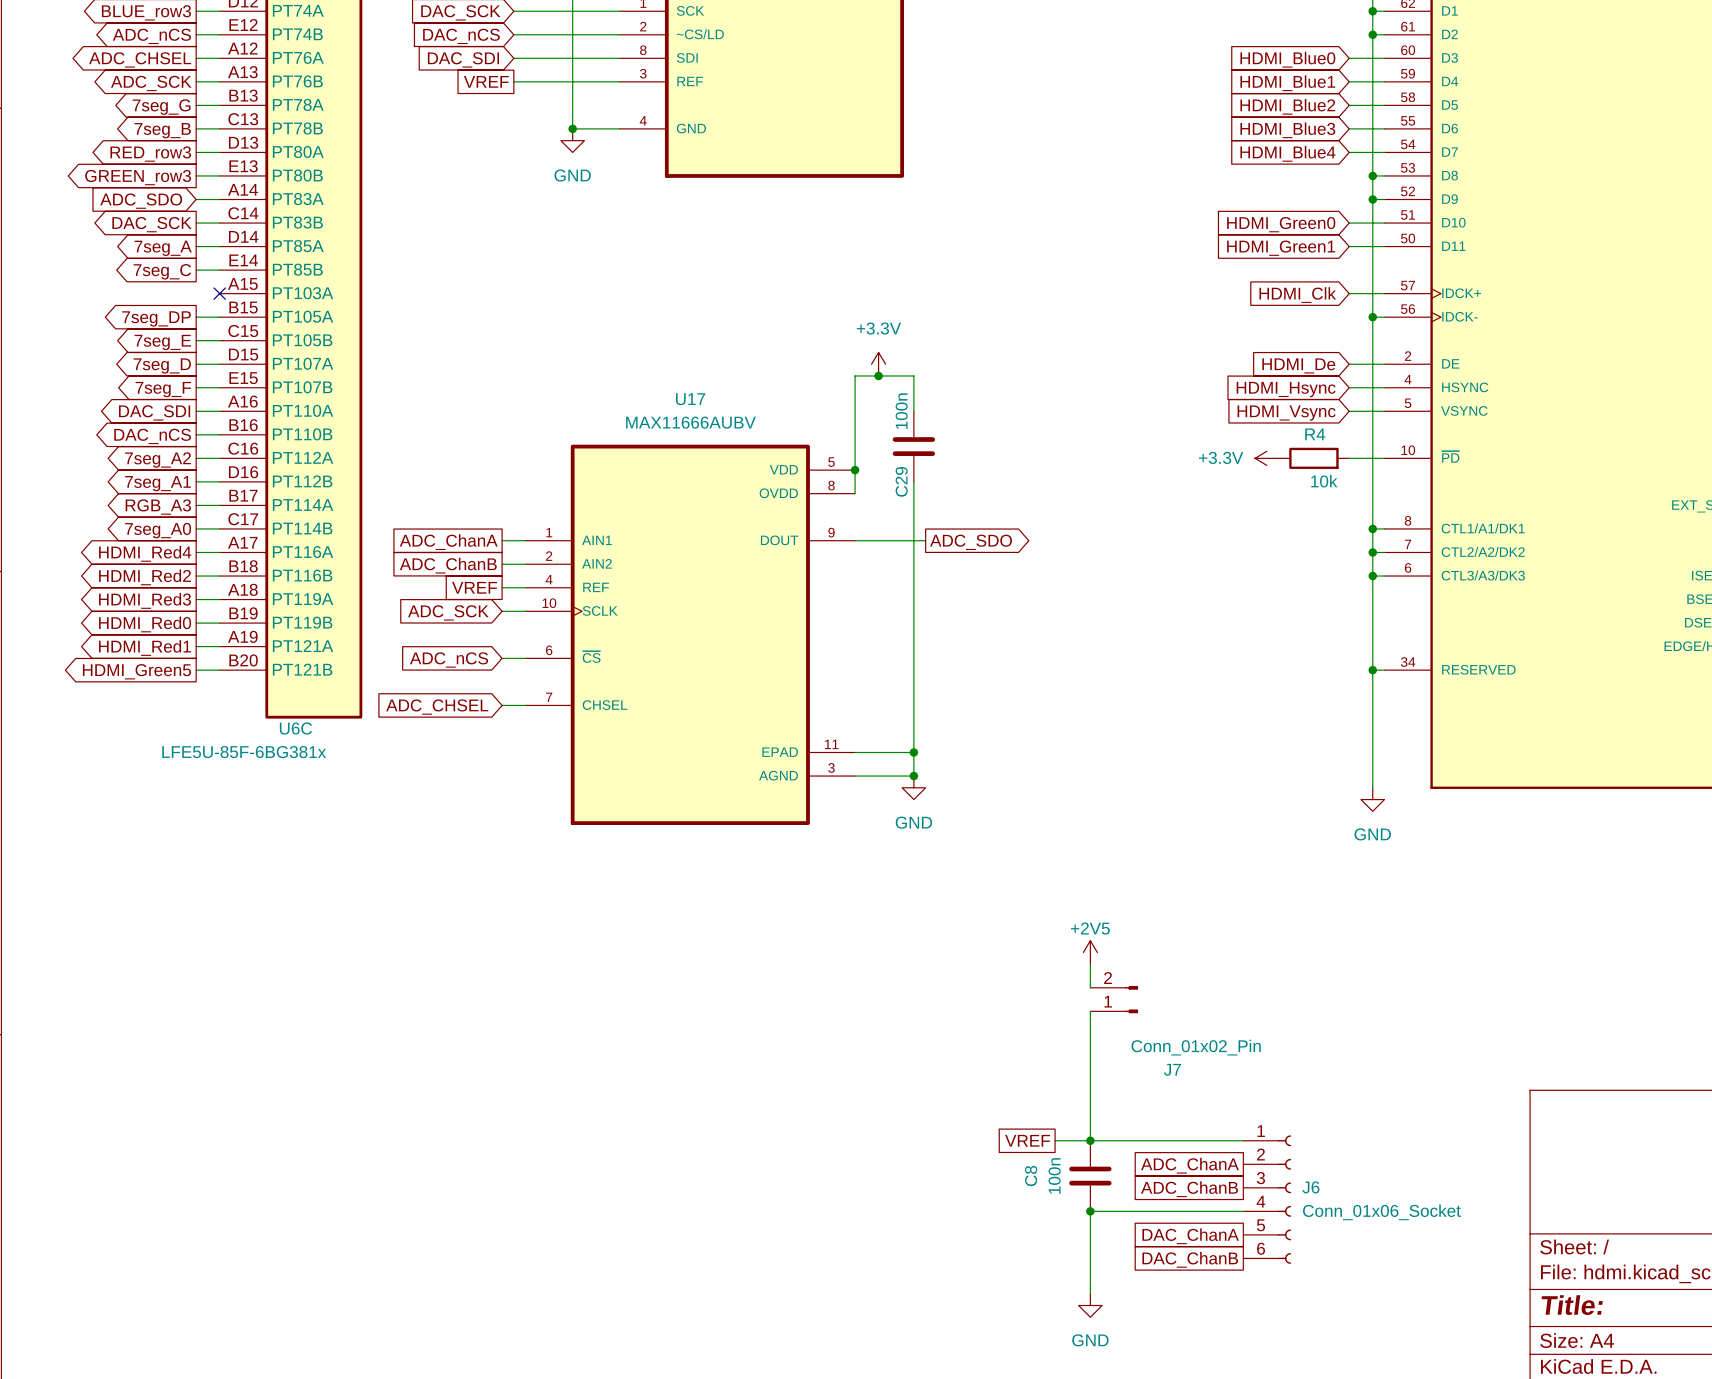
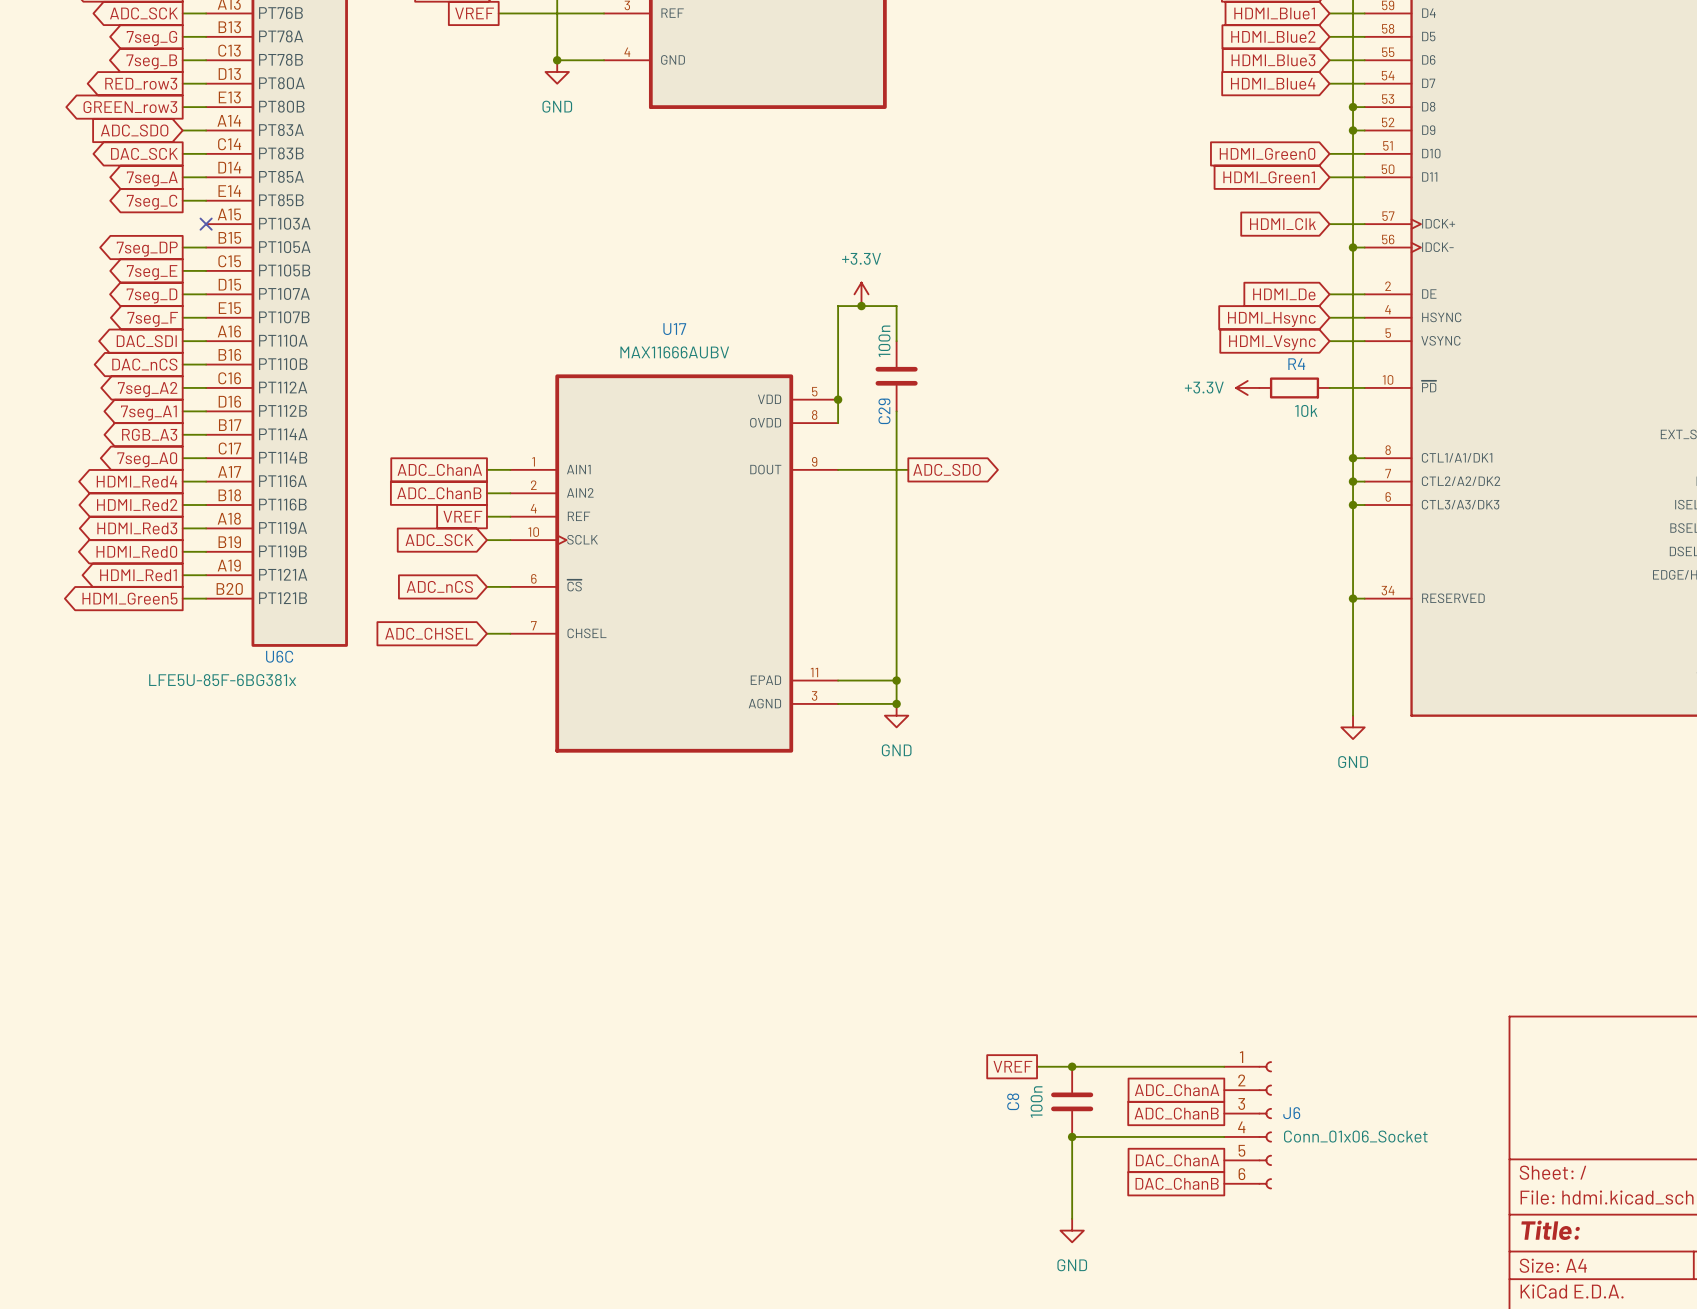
power symbol: +2V5 (1090, 952) -> none
wire: (1090, 964) (1090, 987) -> none
J7: Conn_01x02_Pin (1114, 999) -> none
wire: (1090, 1011) (1090, 1140) -> none

